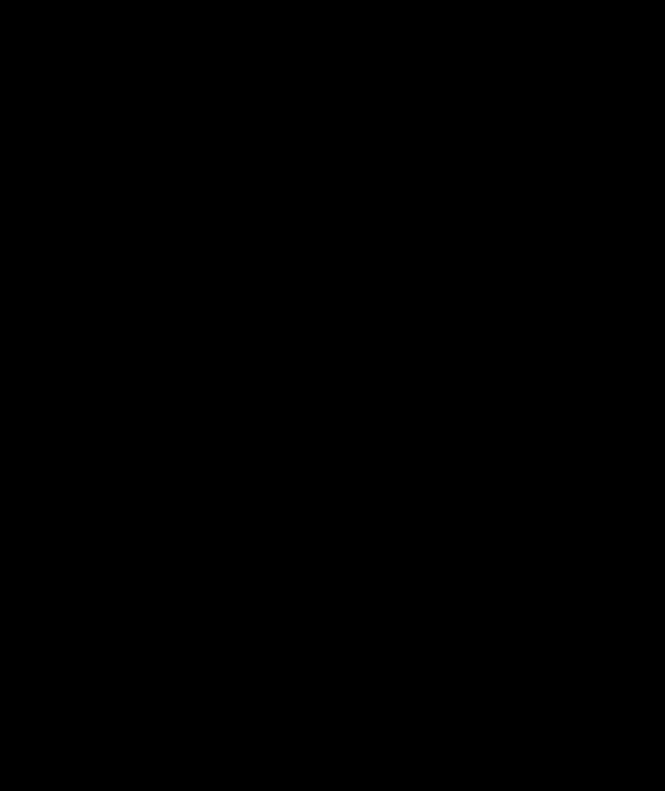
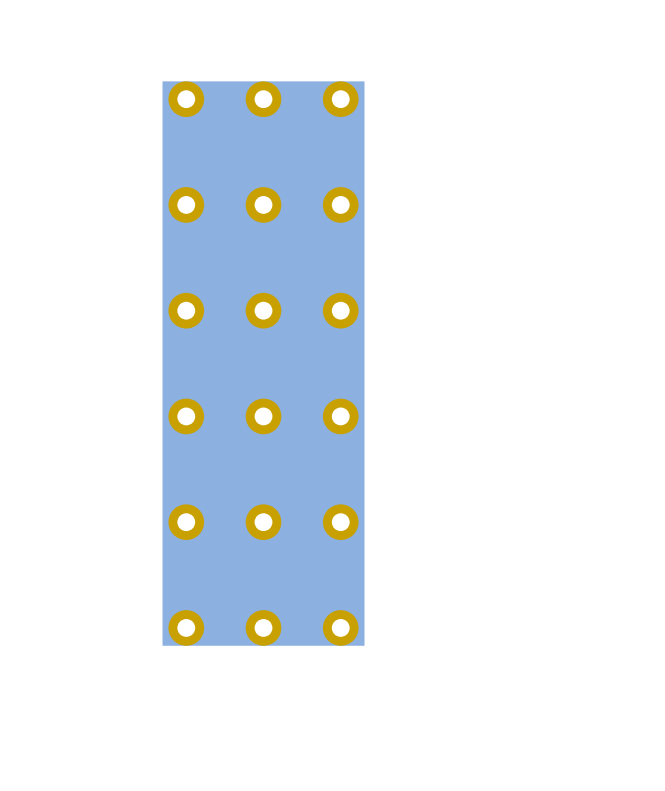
part: none -> (263, 363)

